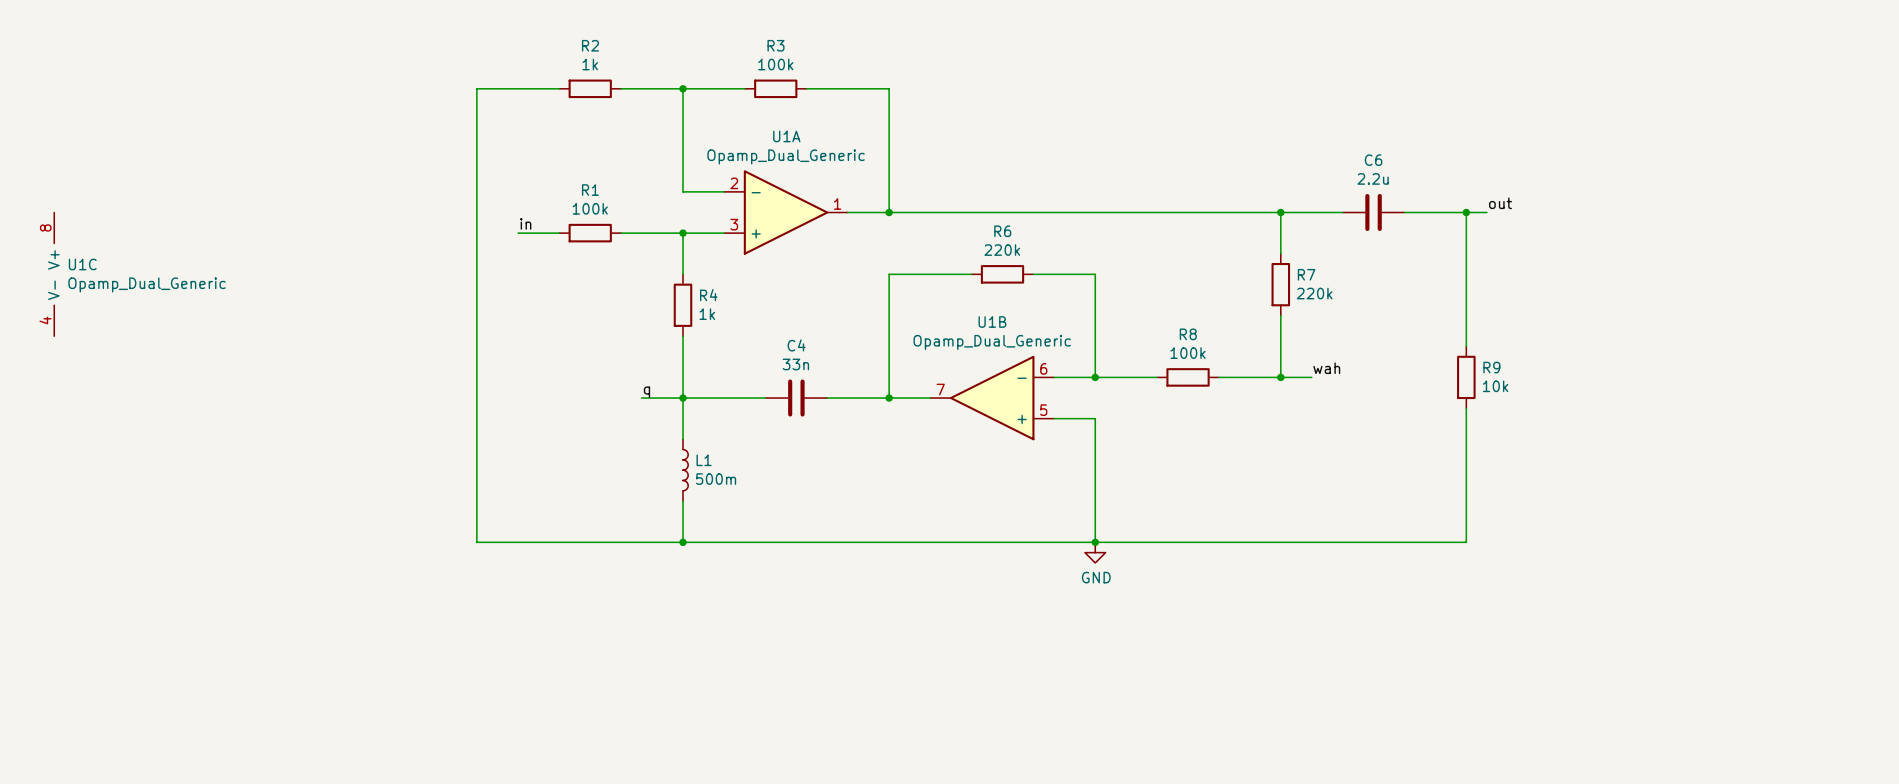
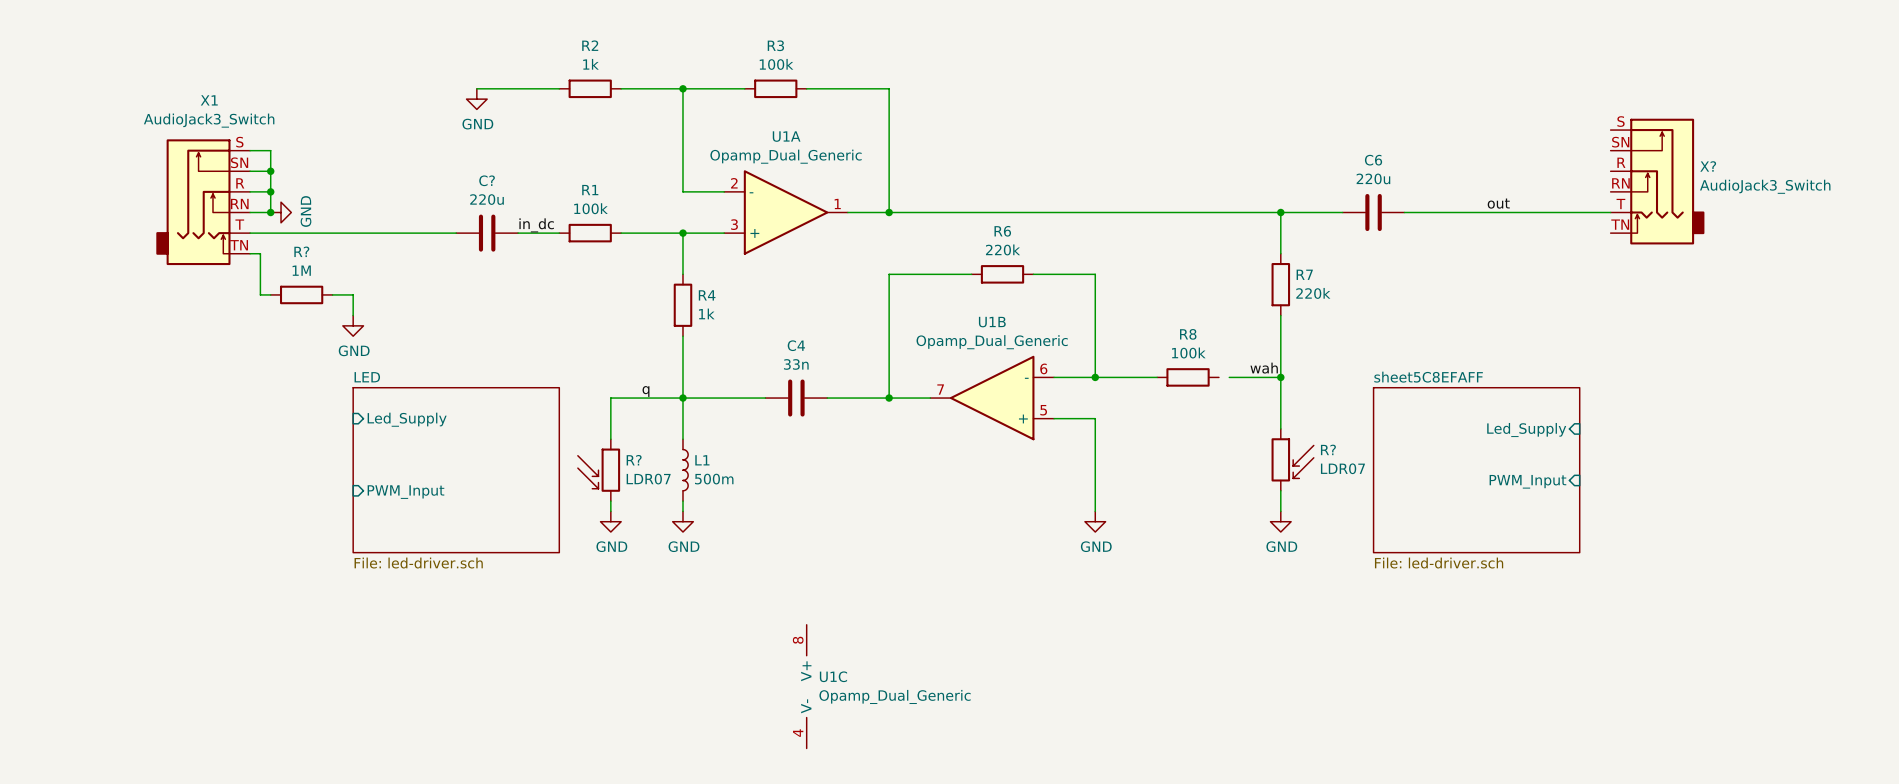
wire: (476, 88) (476, 542) (1466, 542) (1466, 408) -> none
power symbol: none -> GND (476, 99)
wire: none -> (250, 150) (270, 150) (270, 212) (250, 212)
wire: none -> (250, 171) (270, 171)
junction: none -> (270, 171)
C6 value: 2.2u (1373, 178) -> 220u (1373, 178)
X?: none -> AudioJack3_Switch (1657, 181)
wire: none -> (250, 191) (270, 191)
junction: none -> (270, 191)
X1: none -> AudioJack3_Switch (203, 202)
junction: none -> (270, 212)
power symbol: none -> GND (281, 212)
wire: (1466, 212) (1466, 346) -> none
junction: (1466, 212) -> none
wire: none -> (1486, 212) (1610, 212)
label: in (525, 223) -> in_dc (536, 225)
wire: none -> (250, 233) (456, 233)
C?: none -> 220u (487, 233)
wire: none -> (250, 253) (260, 253) (260, 294) (270, 294)
U1C position: (54, 274) -> (806, 686)
R?: none -> 1M (301, 294)
wire: none -> (332, 294) (353, 294) (353, 315)
power symbol: none -> GND (353, 325)
label position: wah (1326, 368) -> wah (1264, 368)
wire: (1218, 377) (1229, 377) -> none
wire: (1280, 377) (1311, 377) -> (1280, 377) (1280, 428)
R9: 10k (1466, 377) -> none
wire: none -> (641, 398) (610, 398) (610, 439)
sheet pin: none -> Led_Supply (407, 419)
sheet pin: none -> Led_Supply (1526, 430)
R?: none -> LDR07 (1292, 459)
sheet LED: none -> File: led-driver.sch (456, 470)
R?: none -> LDR07 (598, 470)
sheet sheet5C8EFAFF: none -> File: led-driver.sch (1476, 470)
sheet pin: none -> PWM_Input (1527, 481)
wire: none -> (1280, 490) (1280, 511)
sheet pin: none -> PWM_Input (405, 492)
wire: none -> (610, 501) (610, 511)
wire: (682, 511) (682, 542) -> none
wire: (1095, 511) (1095, 542) -> none
power symbol: none -> GND (610, 521)
power symbol: none -> GND (682, 521)
power symbol: none -> GND (1280, 521)
junction: (682, 542) -> none
junction: (1095, 542) -> none
power symbol position: GND (1095, 552) -> GND (1095, 521)

